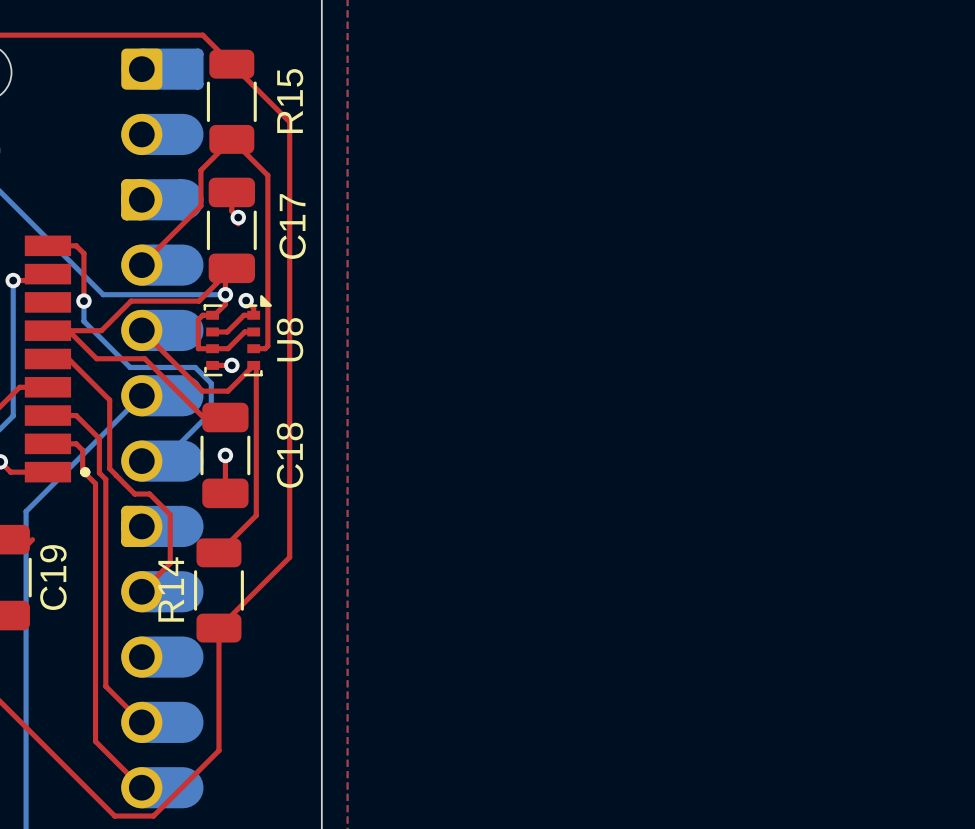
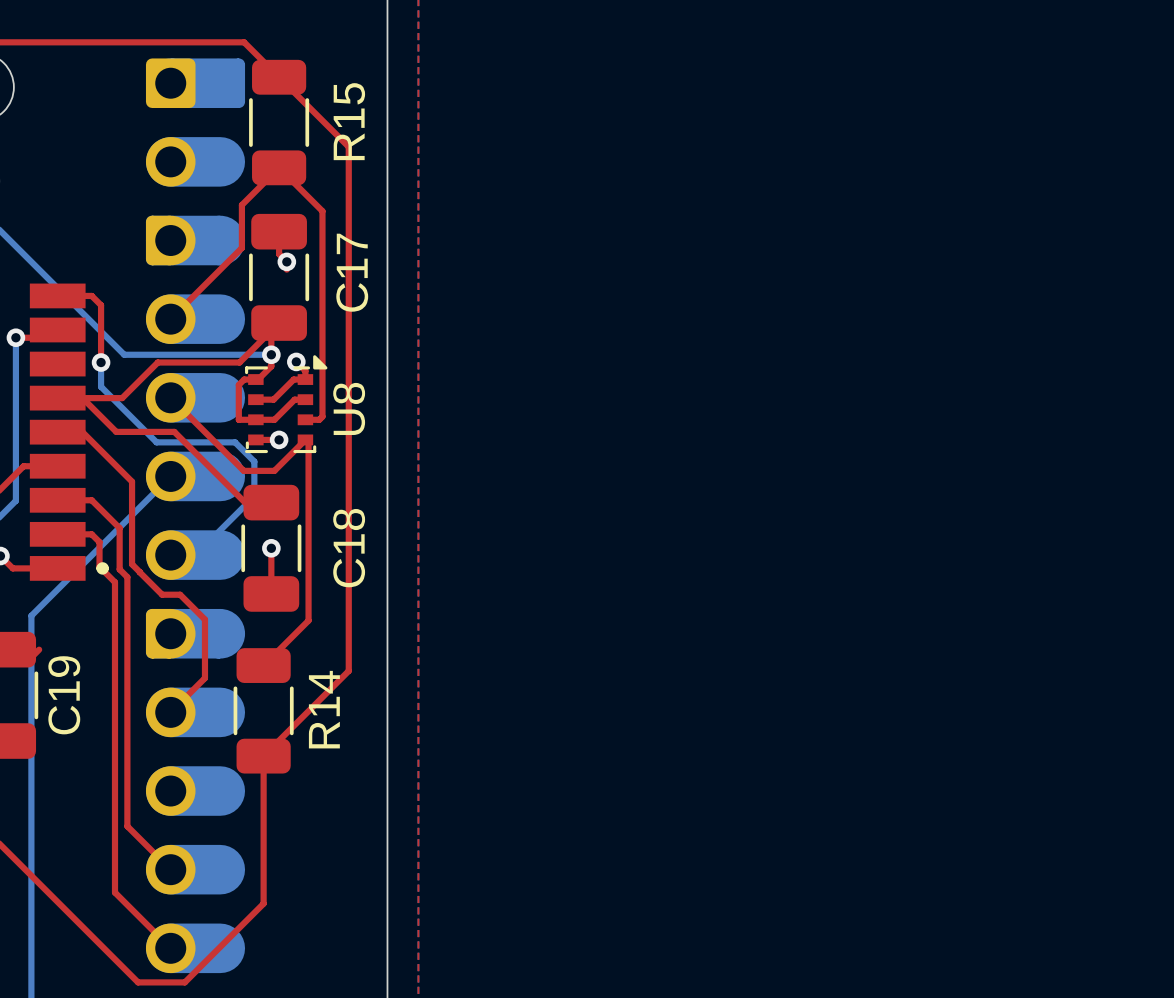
R14 name position: R14 (171, 589) -> R14 (324, 709)

